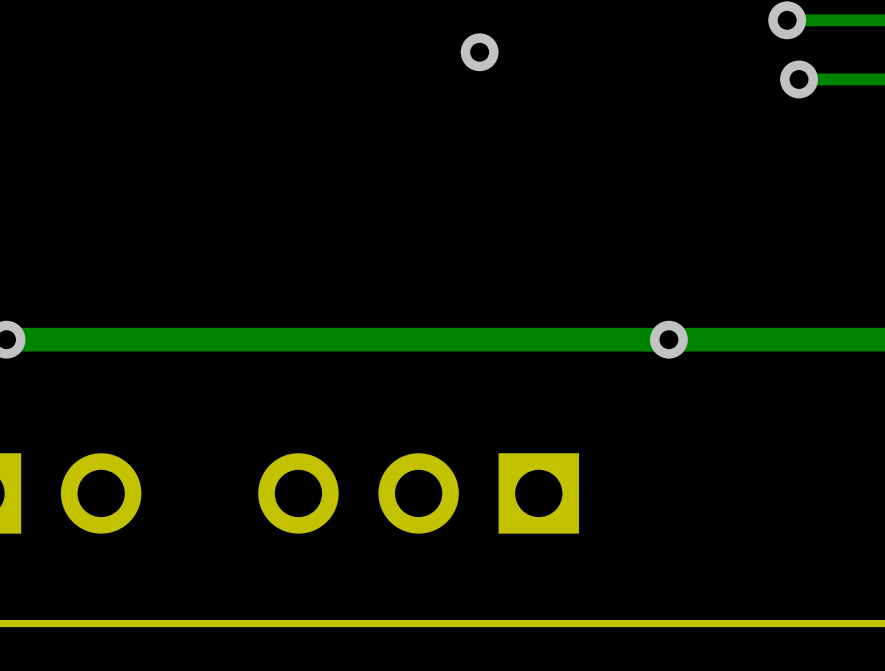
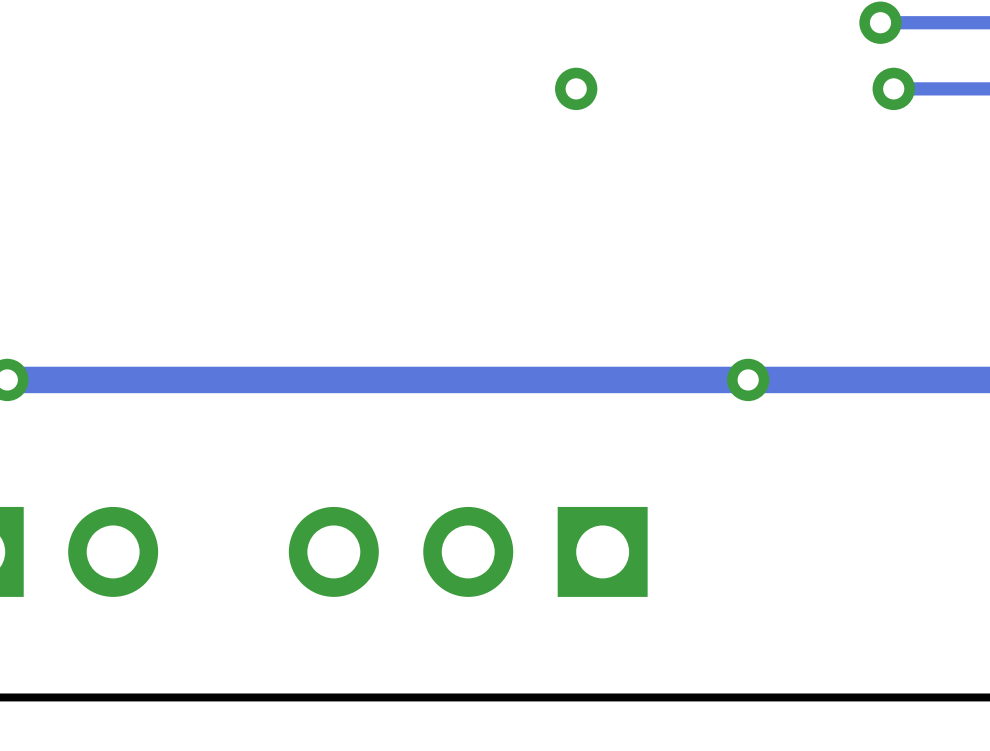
via position: (479, 52) -> (576, 88)

